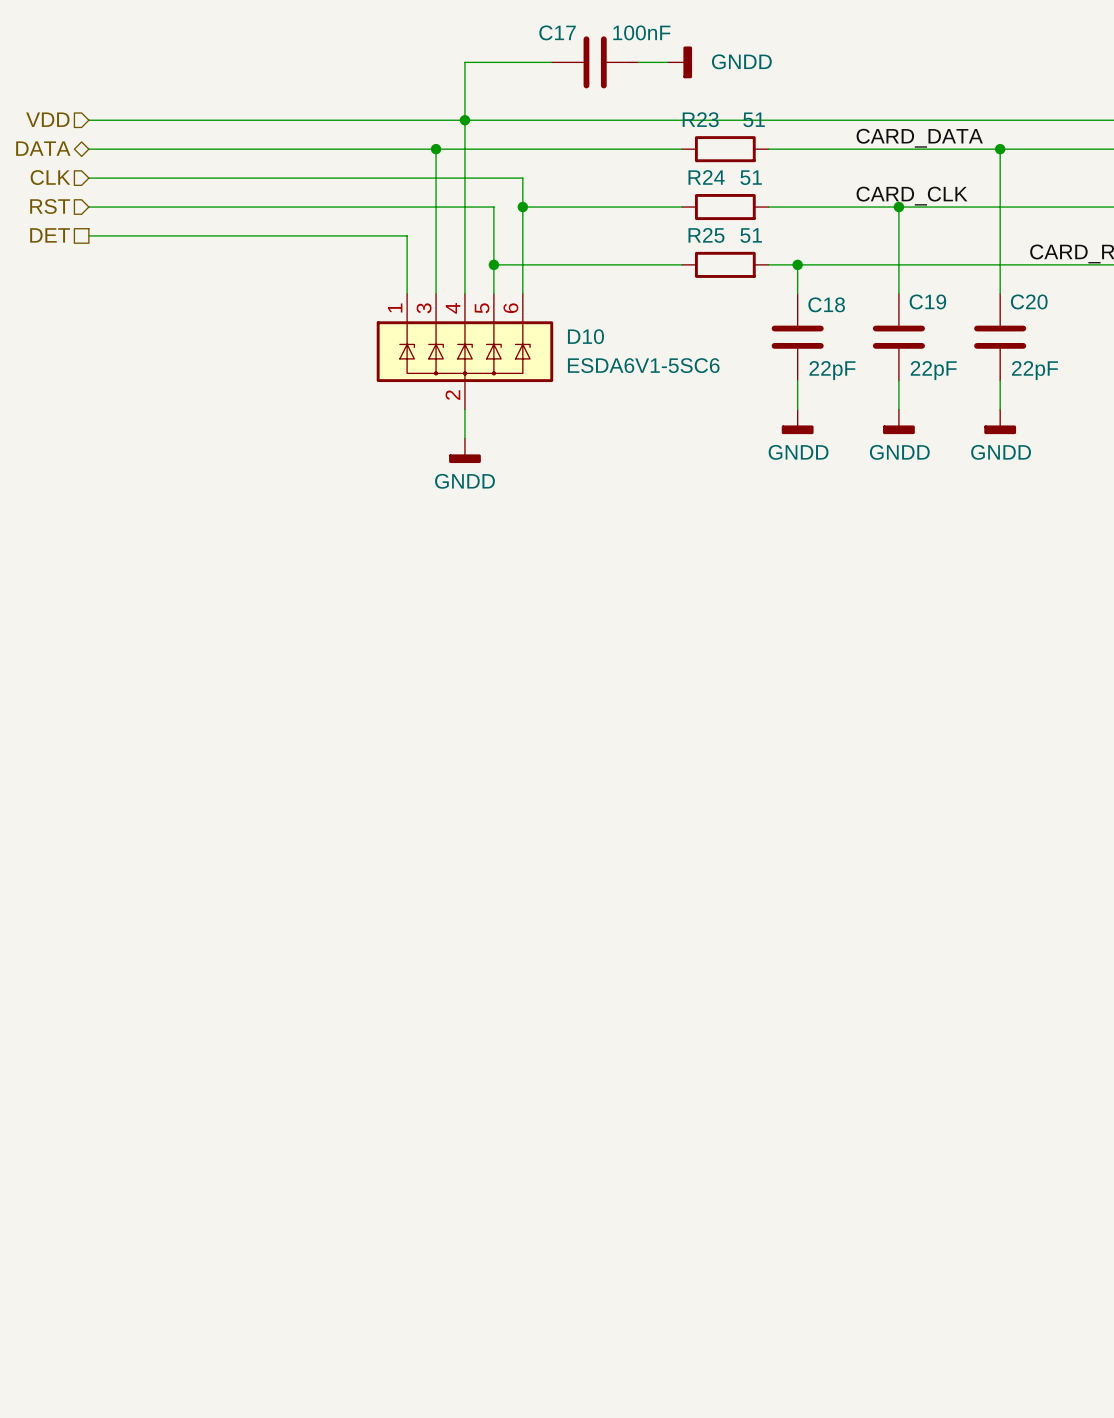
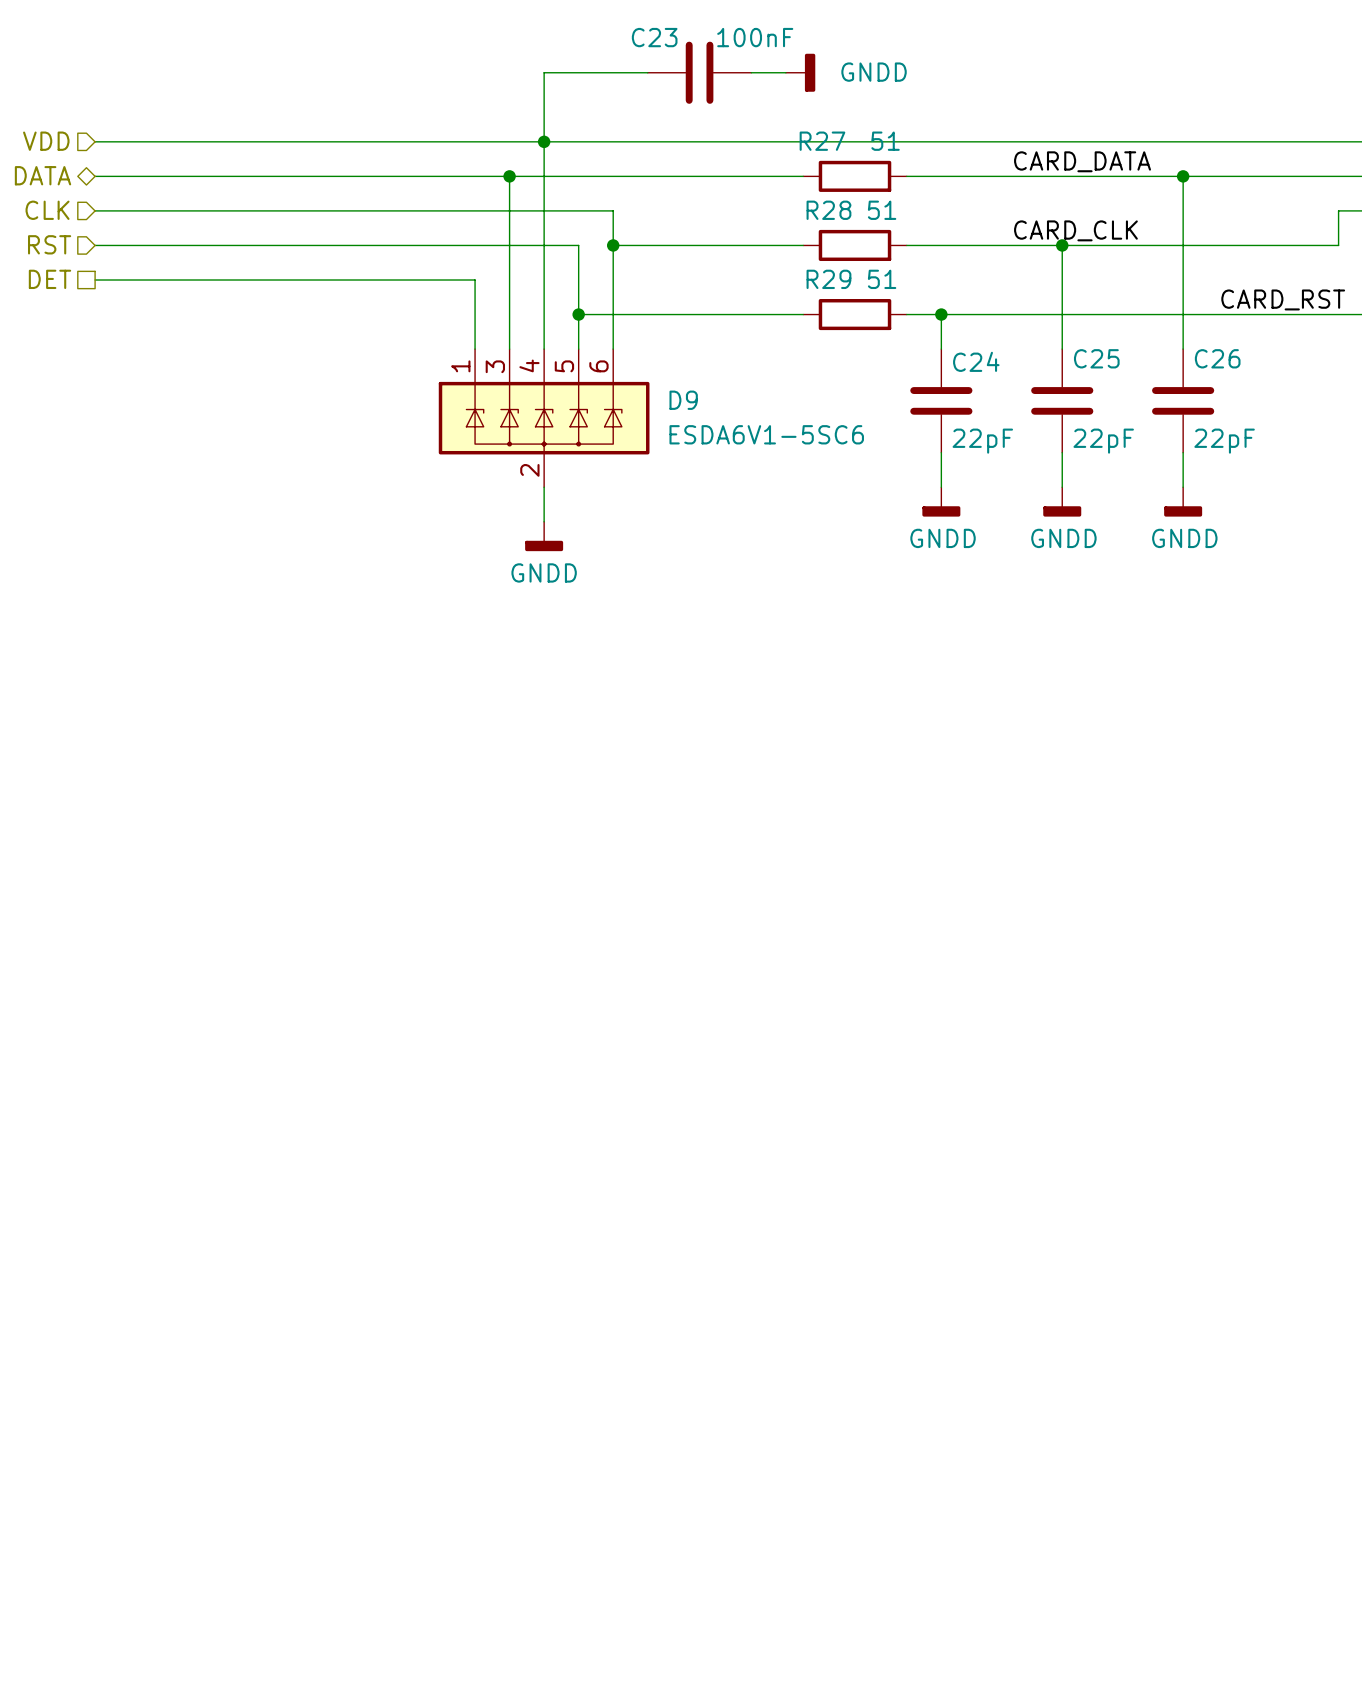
C17 name: C17 (557, 32) -> C23 (654, 37)
R23 name: R23 (700, 119) -> R27 (822, 141)
R24 name: R24 (706, 177) -> R28 (828, 210)
R25 name: R25 (706, 235) -> R29 (828, 279)
C19 name: C19 (927, 301) -> C25 (1096, 358)
C20 name: C20 (1029, 301) -> C26 (1217, 358)
C18 name: C18 (826, 304) -> C24 (976, 361)
D10 name: D10 (585, 336) -> D9 (683, 400)

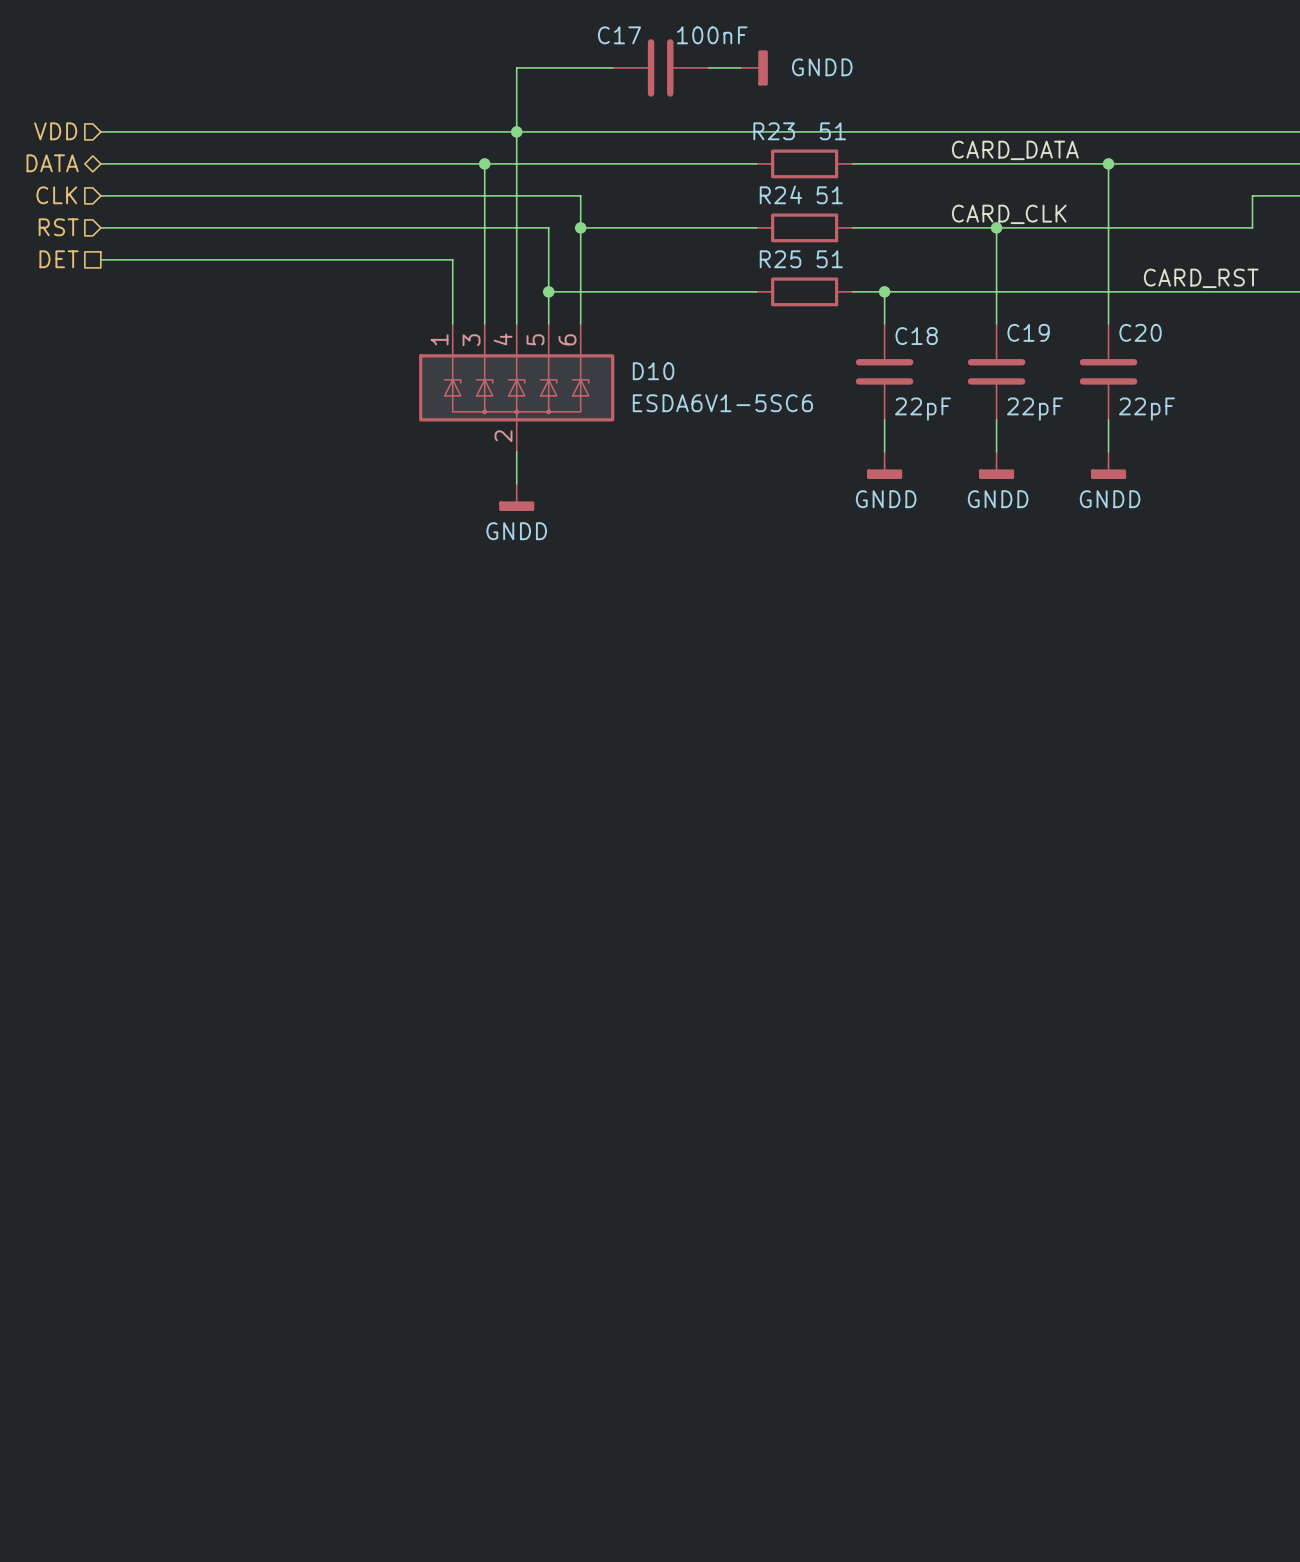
C23 name: C23 (654, 37) -> C17 (619, 35)
R27 name: R27 (822, 141) -> R23 (774, 131)
R28 name: R28 (828, 210) -> R24 (780, 194)
R29 name: R29 (828, 279) -> R25 (780, 259)
C25 name: C25 (1096, 358) -> C19 (1028, 332)
C26 name: C26 (1217, 358) -> C20 (1140, 332)
C24 name: C24 (976, 361) -> C18 (916, 336)
D9 name: D9 (683, 400) -> D10 (653, 371)

